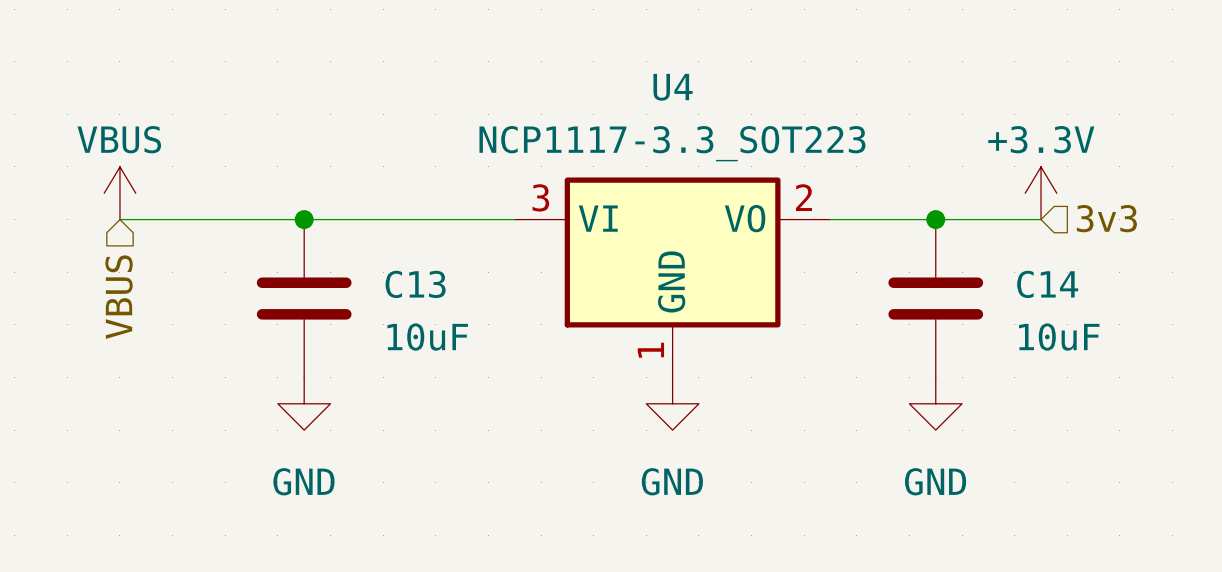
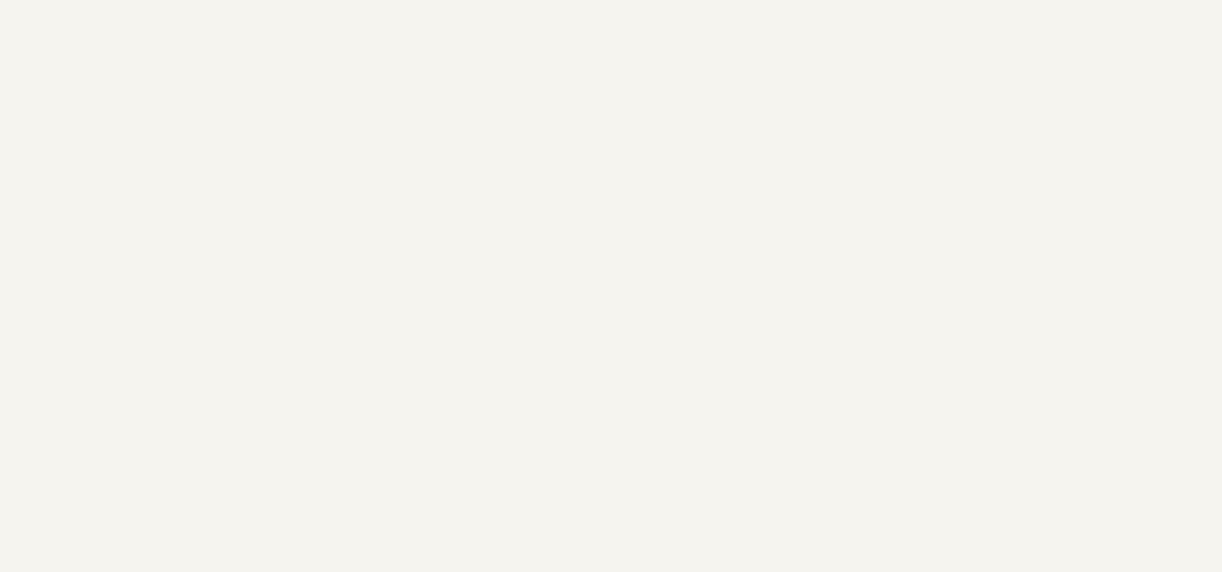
power symbol: VBUS (119, 193) -> none
power symbol: +3.3V (1041, 193) -> none
hierarchical label: 3v3 (1106, 218) -> none
wire: (119, 219) (514, 219) -> none
junction: (304, 219) -> none
wire: (830, 219) (1041, 219) -> none
junction: (935, 219) -> none
U4: NCP1117-3.3_SOT223 (672, 277) -> none
hierarchical label: VBUS (119, 297) -> none
C13: 10uF (304, 298) -> none
C14: 10uF (935, 298) -> none
power symbol: GND (304, 403) -> none
power symbol: GND (672, 403) -> none
power symbol: GND (935, 403) -> none

